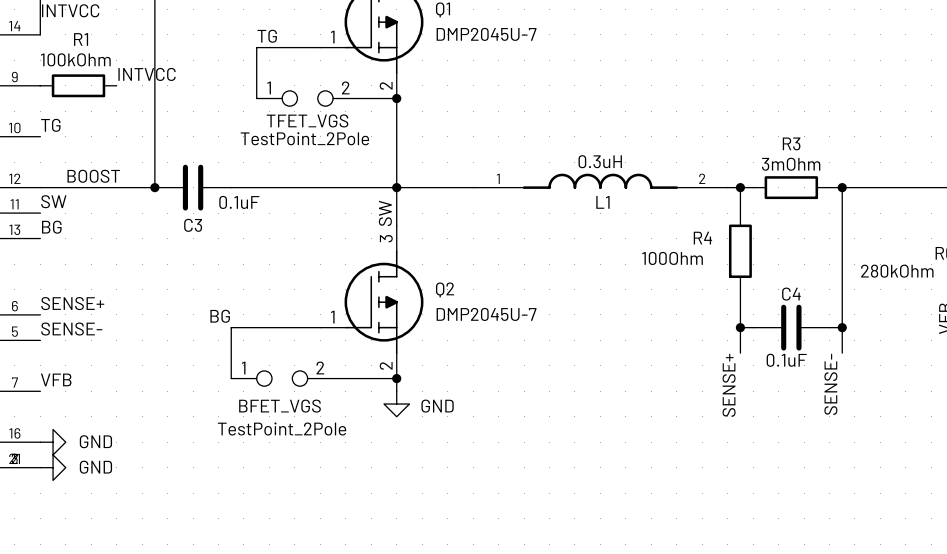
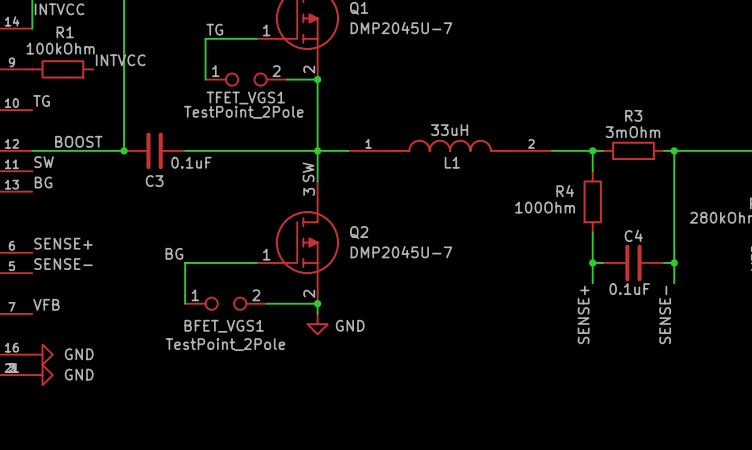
TFET_VGS name: TFET_VGS (307, 120) -> TFET_VGS1 (245, 98)
L1 value: 0.3uH (600, 161) -> 33uH (449, 130)
L1 position: (600, 181) -> (450, 145)
BFET_VGS name: BFET_VGS (279, 406) -> BFET_VGS1 (224, 326)

